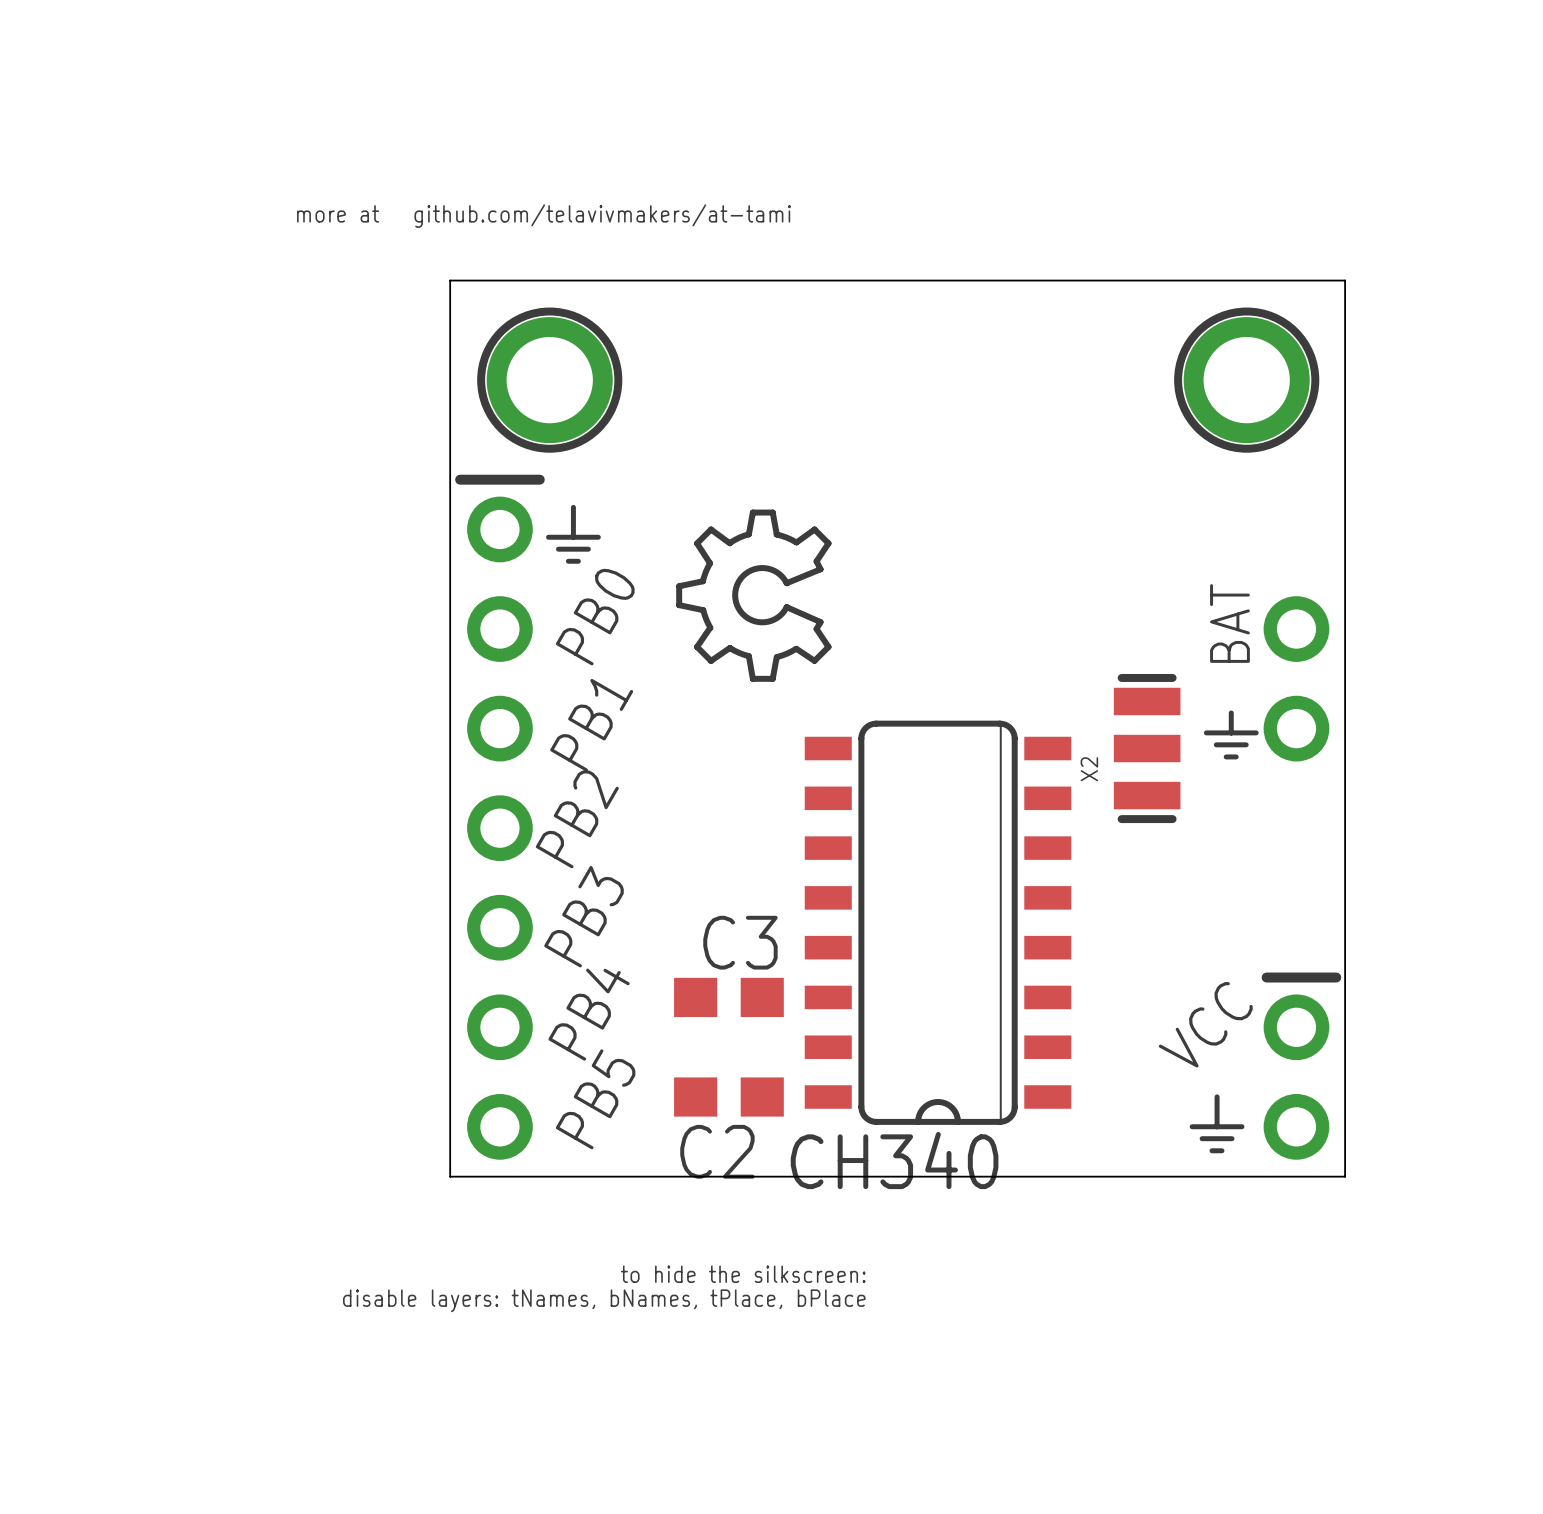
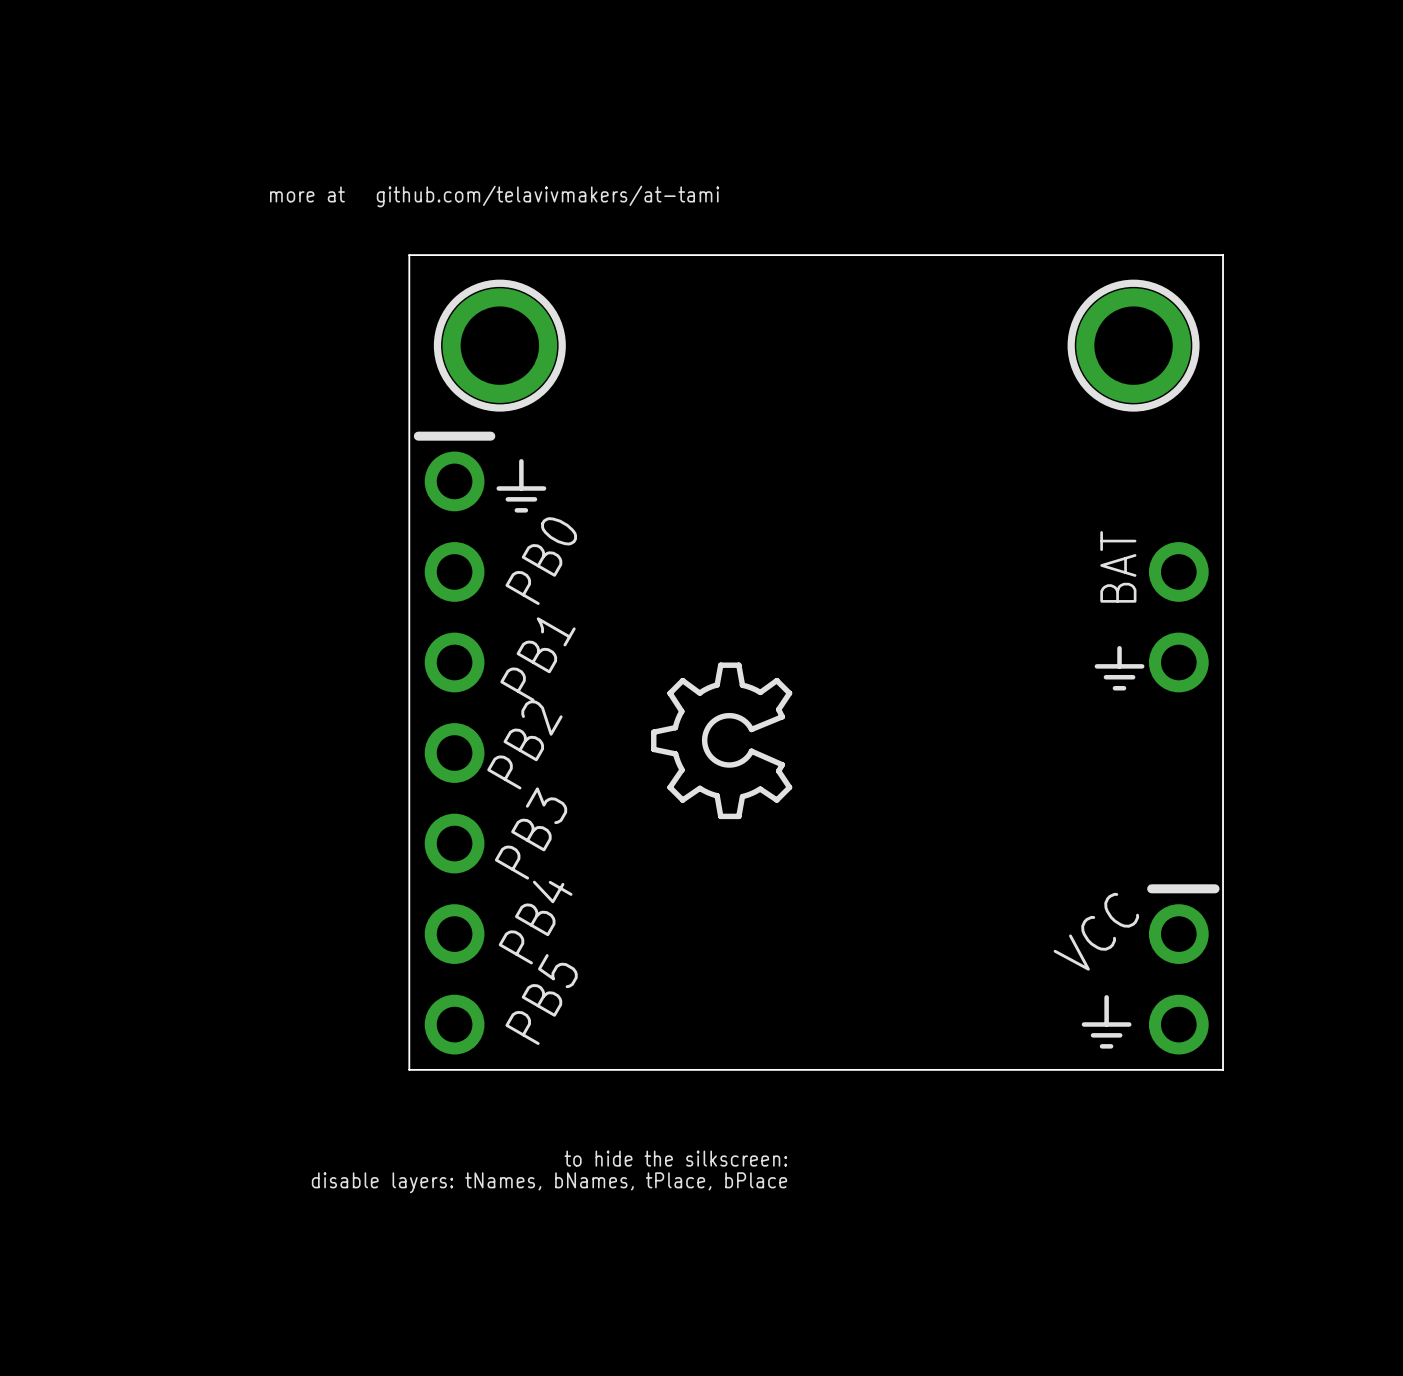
drawing position: (753, 595) -> (721, 740)
X2: (1147, 748) -> none
CH340: (938, 922) -> none
C3: (728, 997) -> none
C2: (728, 1097) -> none

